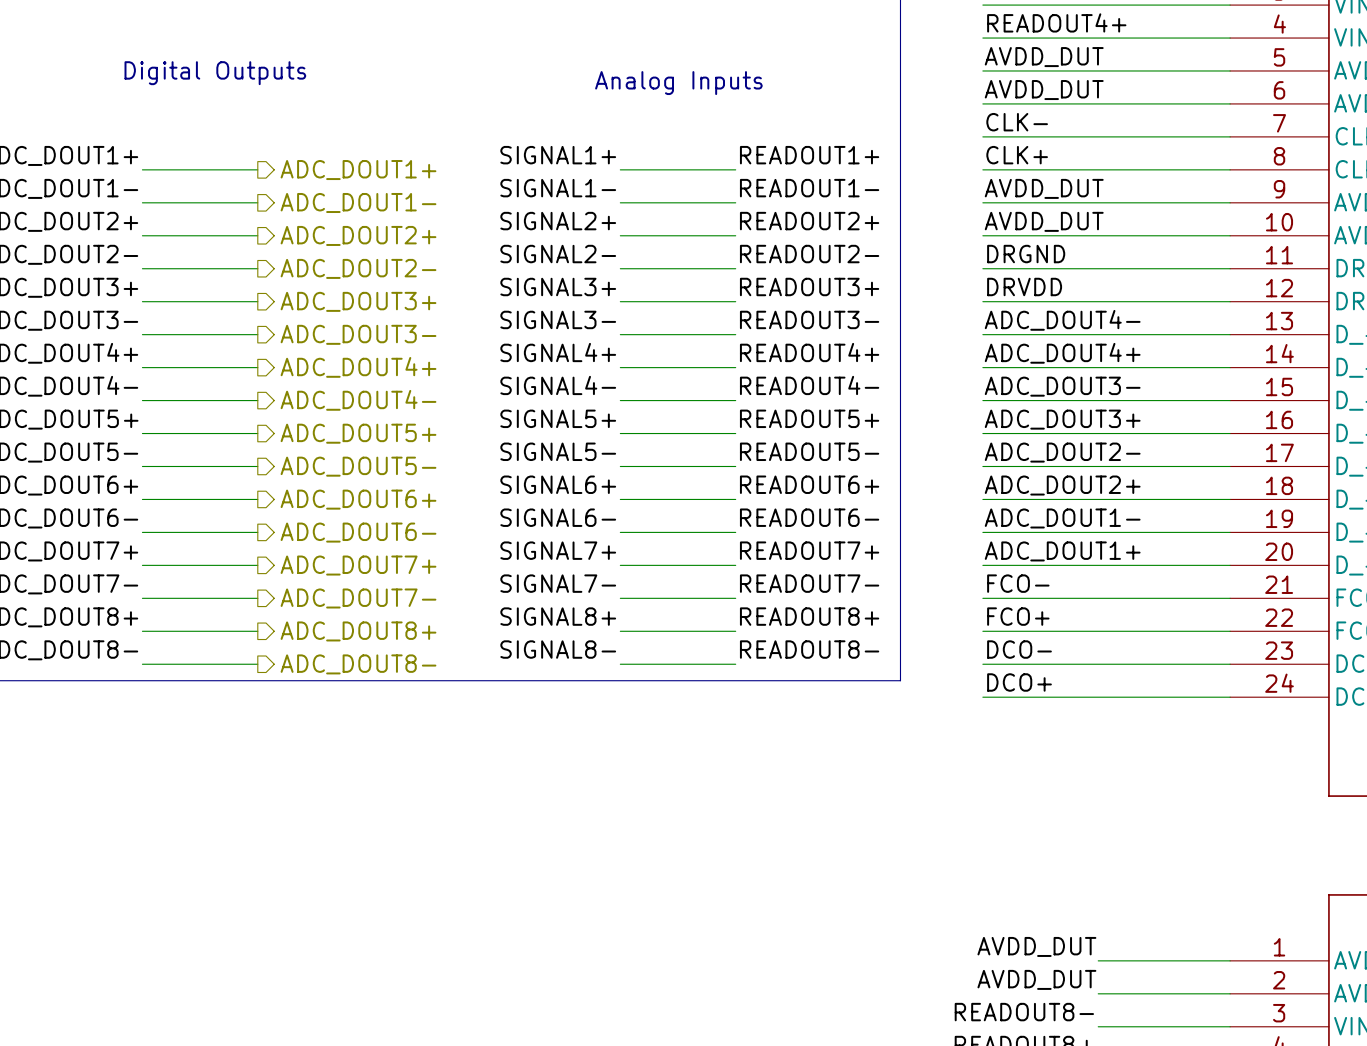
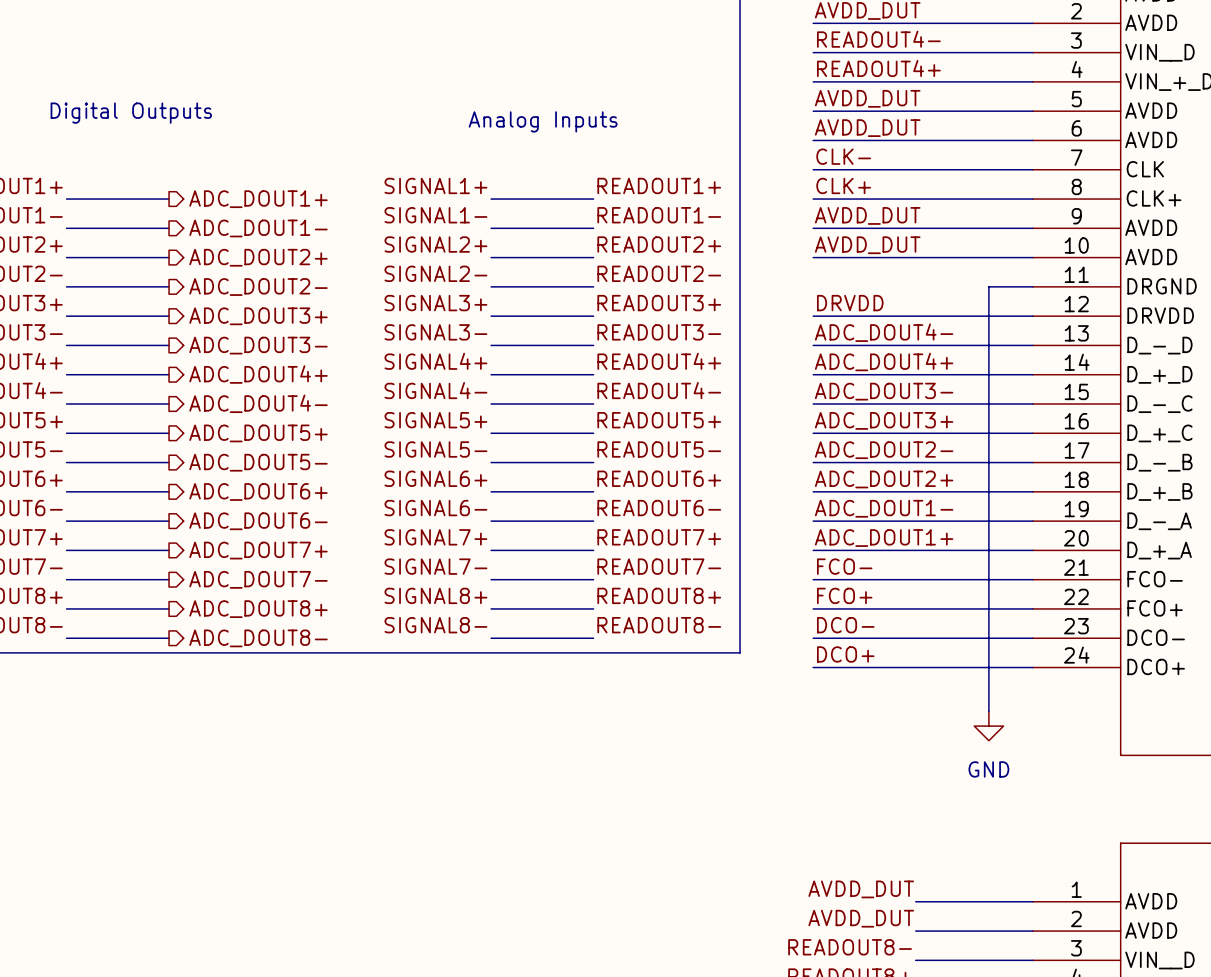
label: DRGND (1026, 254) -> none
wire: (982, 268) (1180, 268) -> (988, 711) (988, 286)
power symbol: none -> GND (988, 726)

